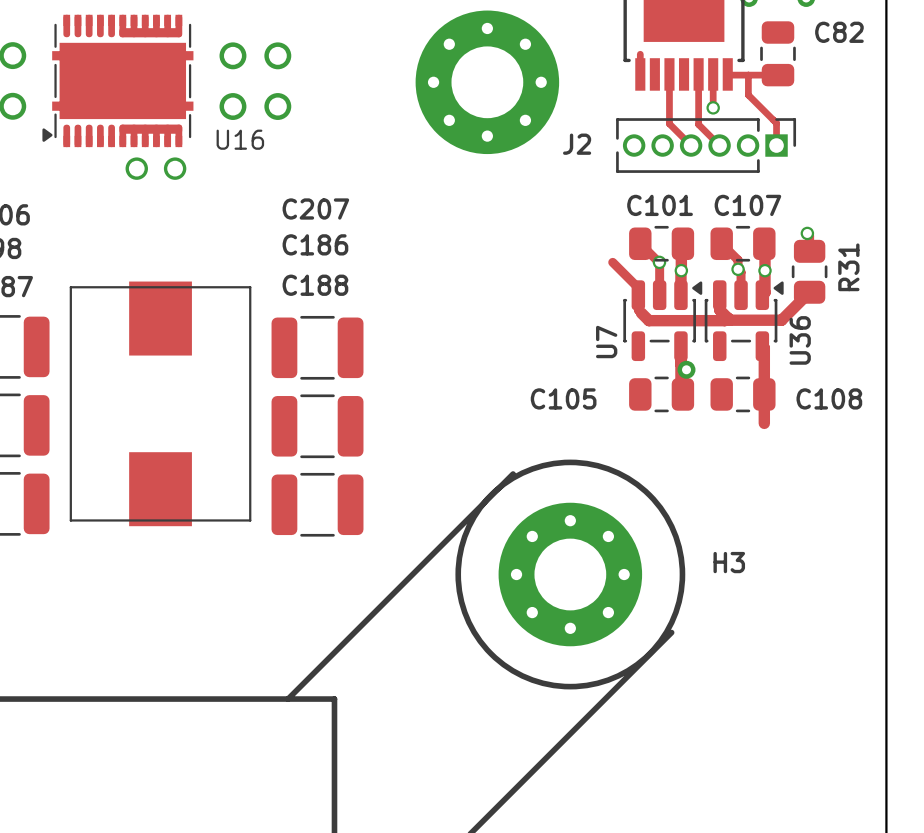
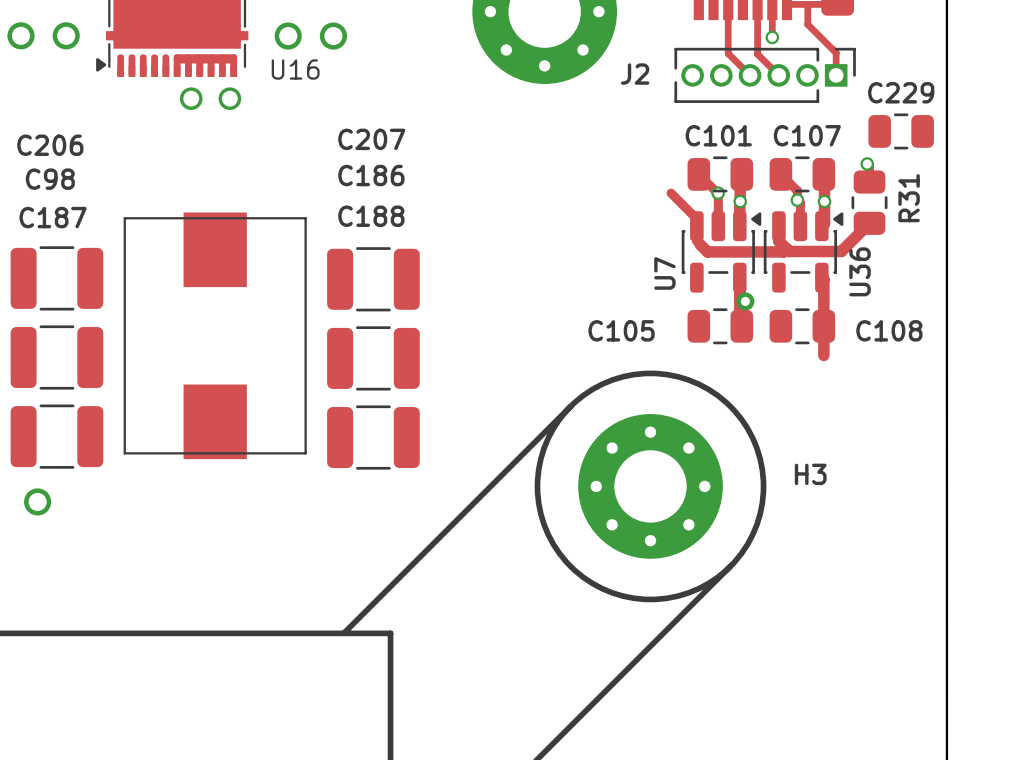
C229: none -> (901, 131)
H3 position: (570, 574) -> (650, 486)
drawing position: (570, 574) -> (650, 486)

